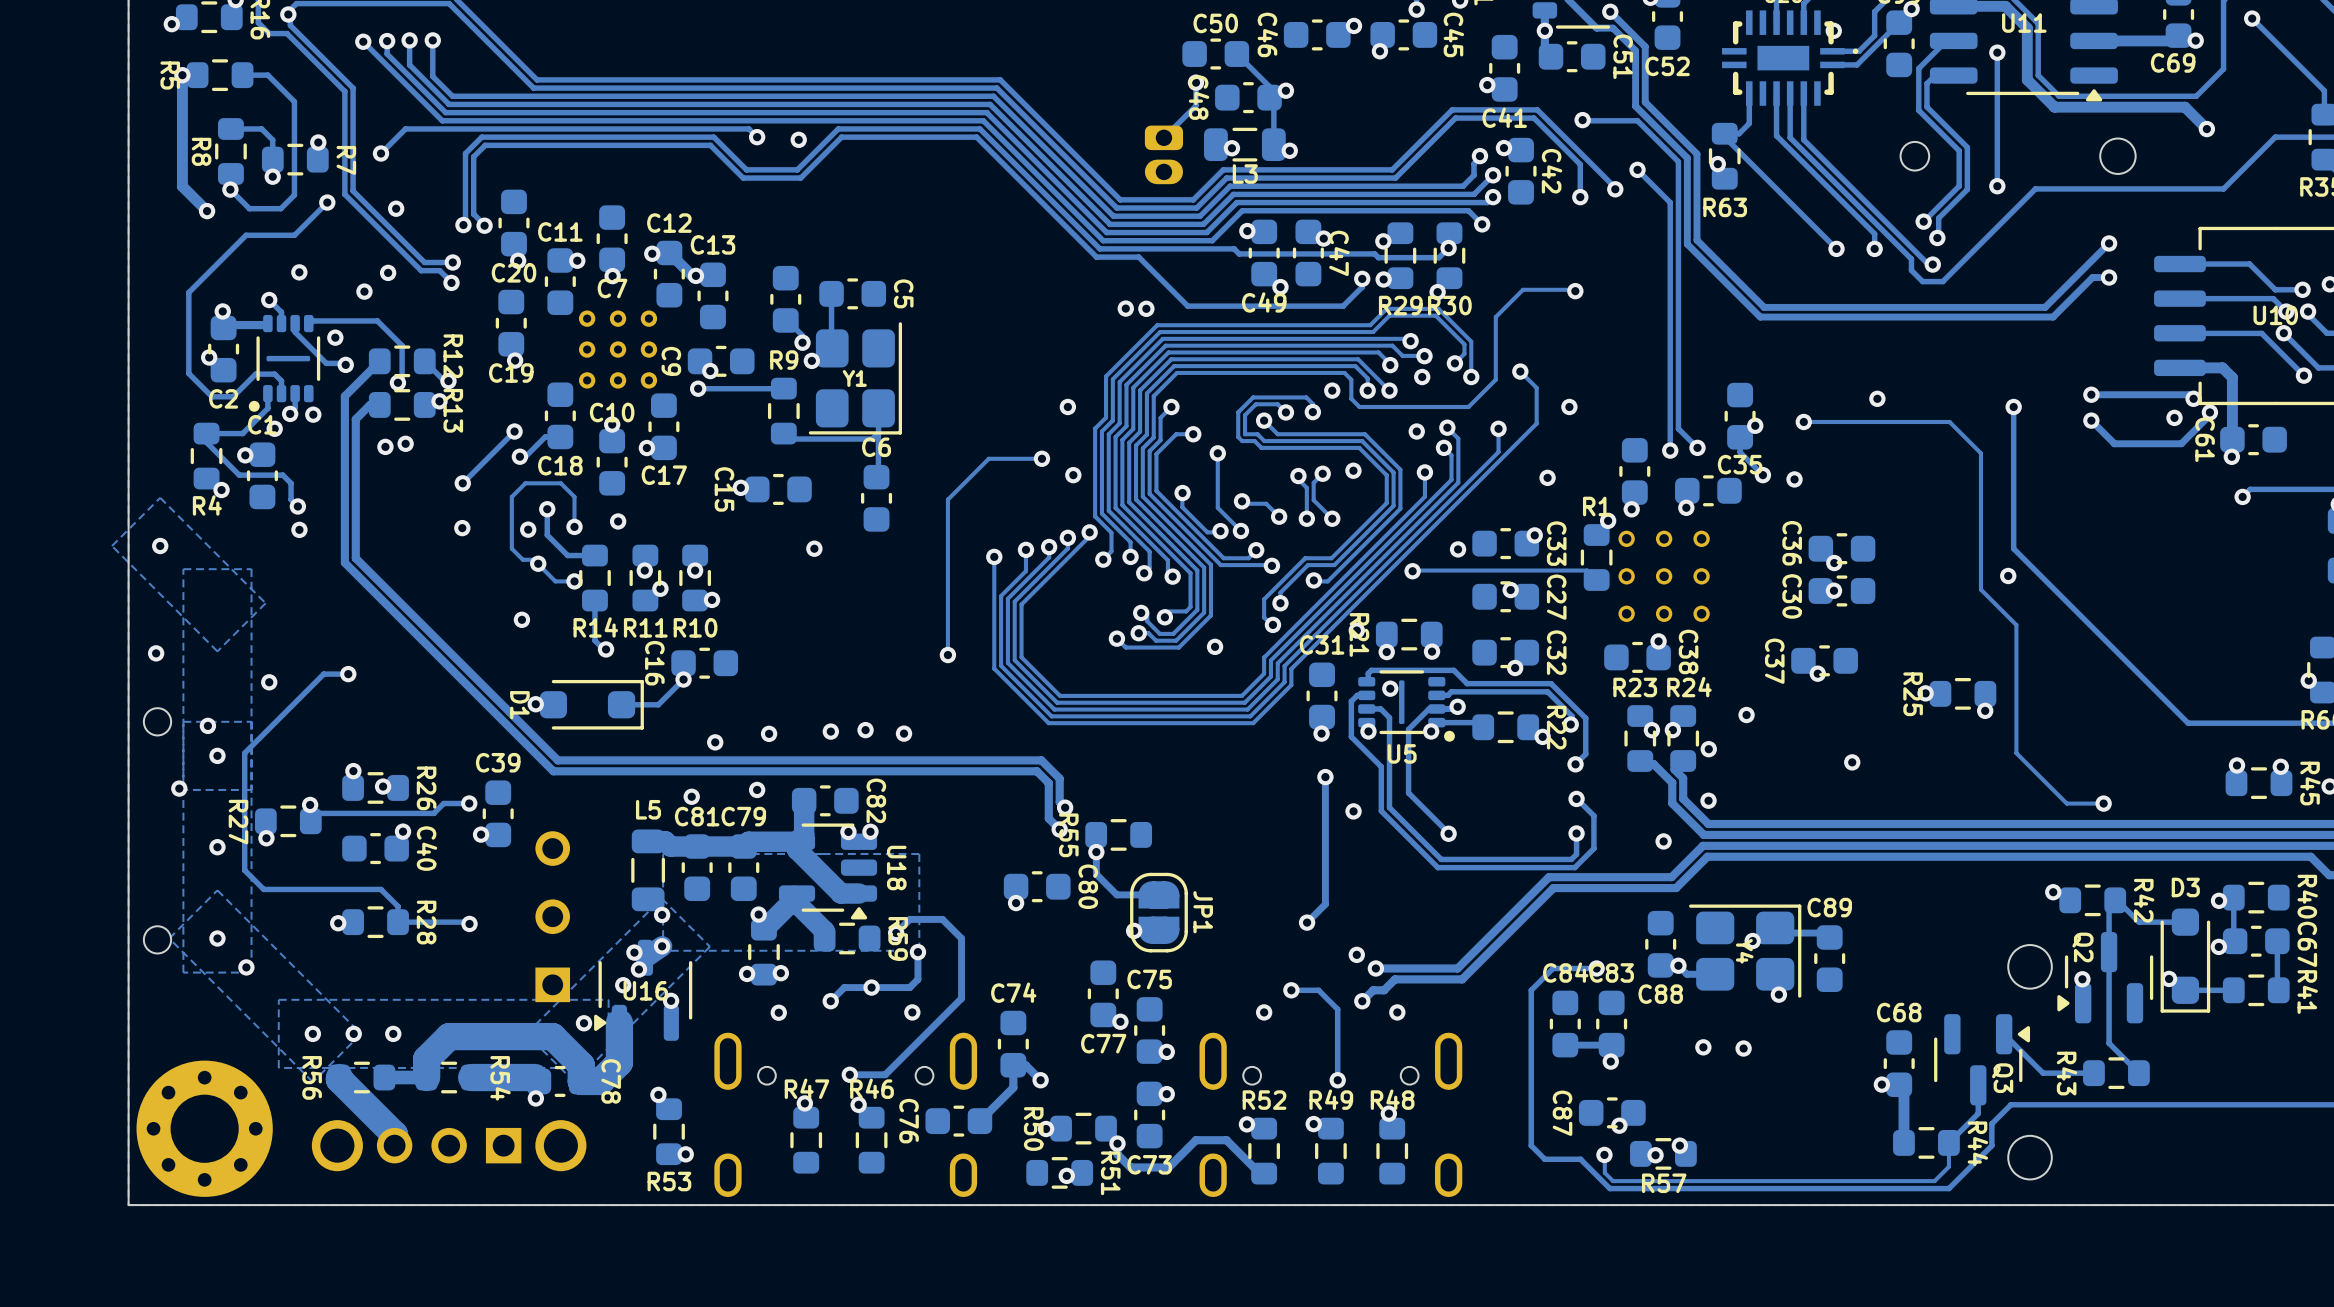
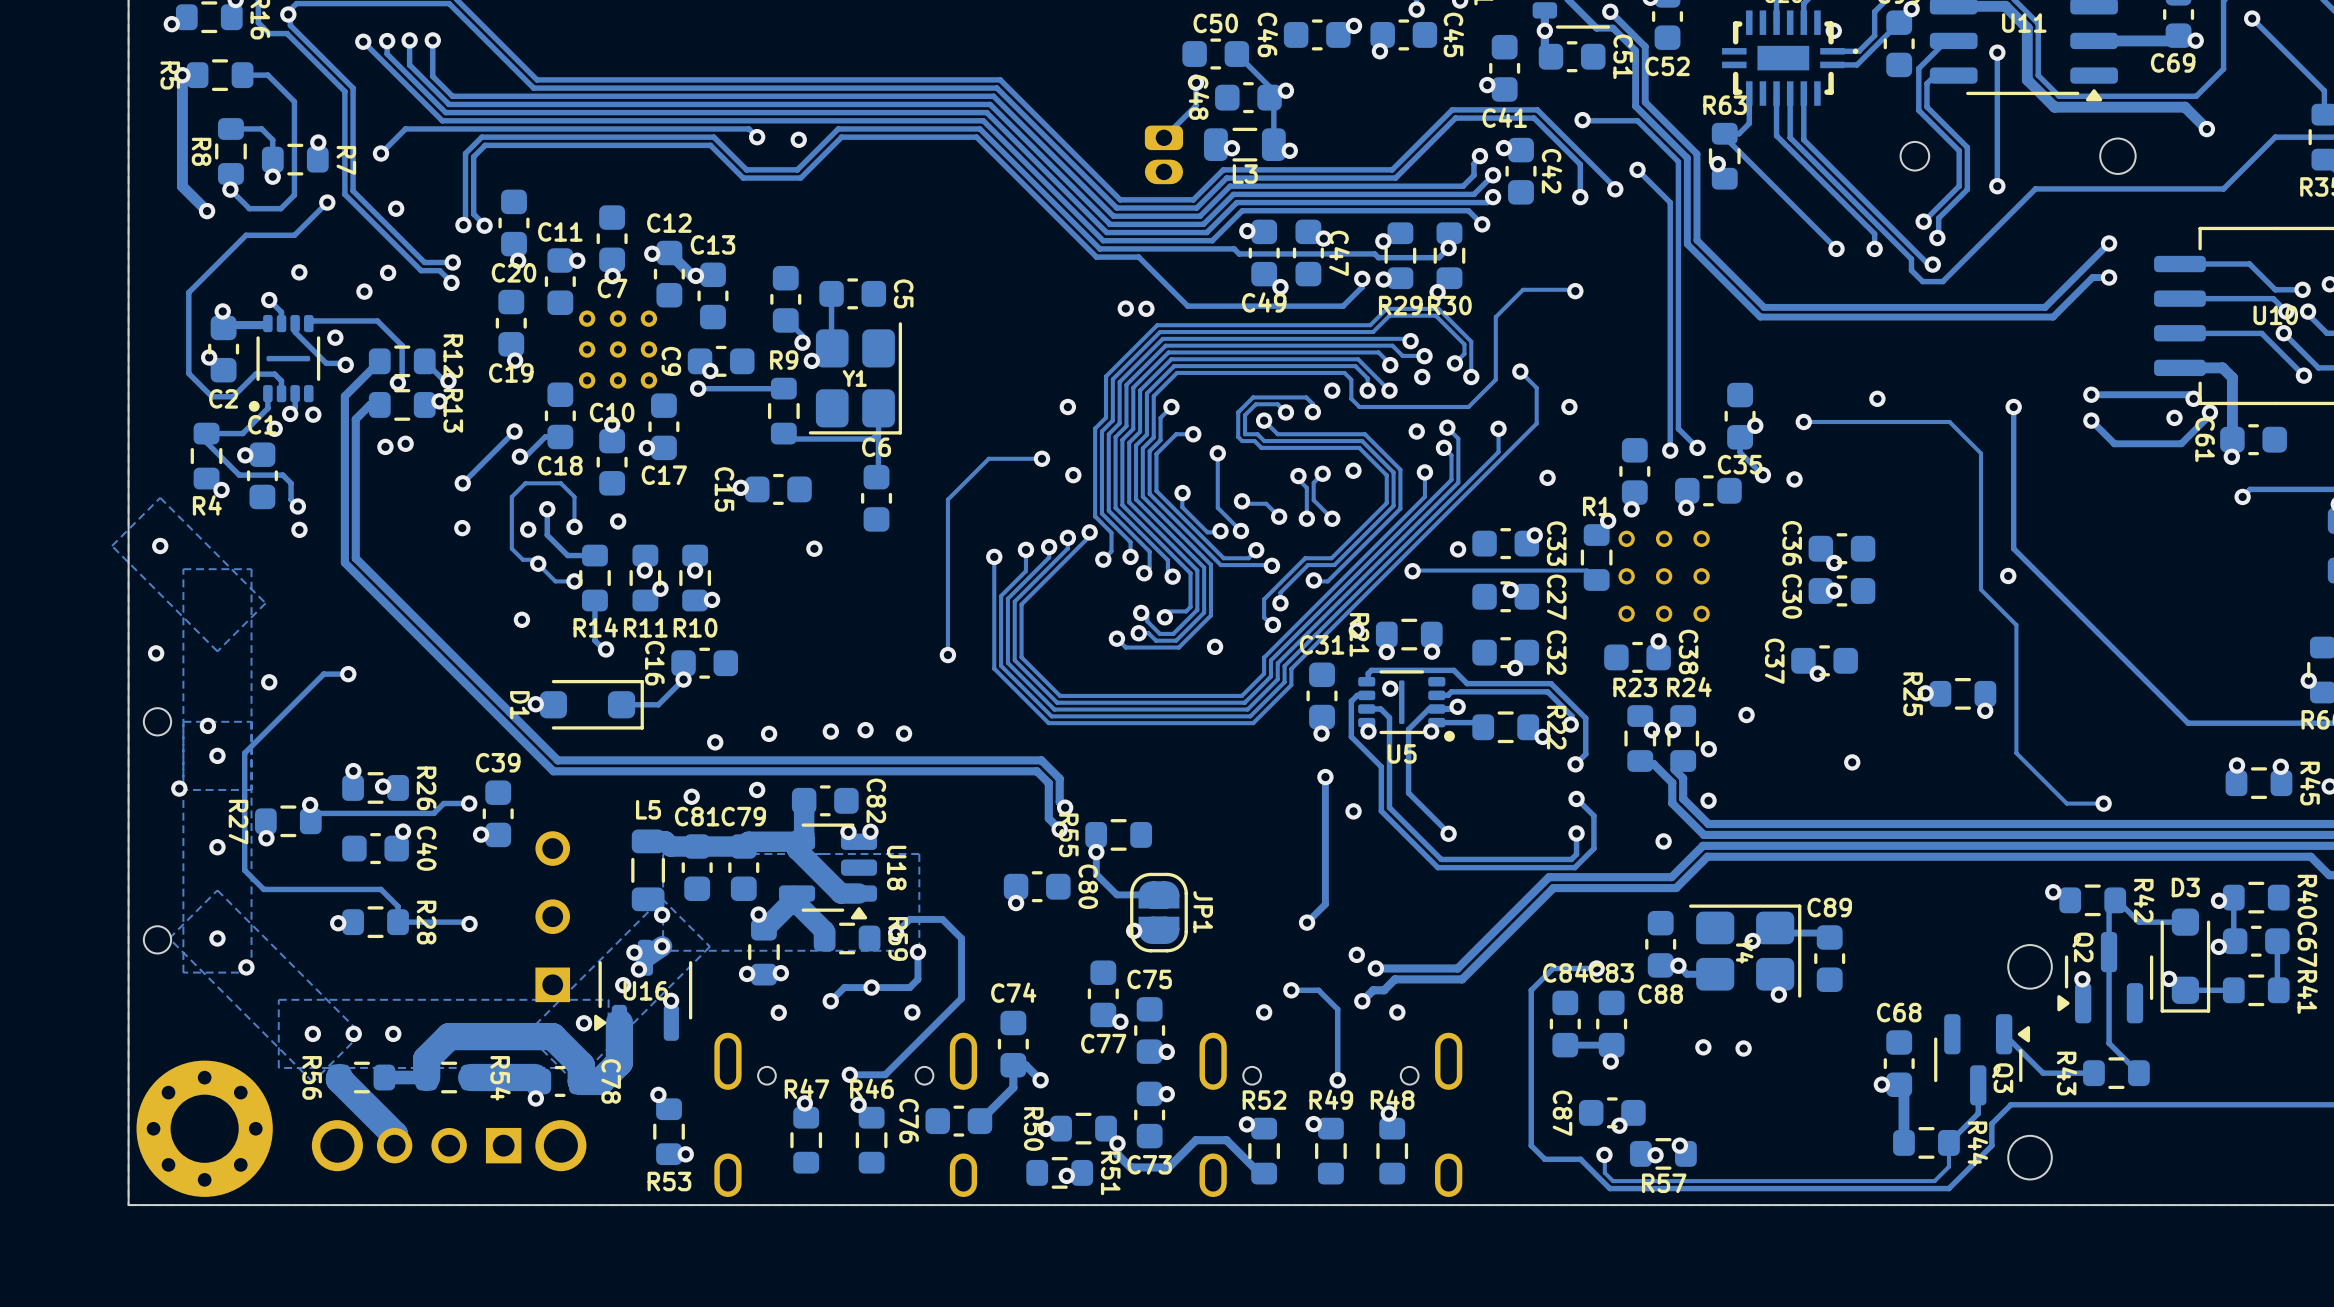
R63 name position: R63 (1725, 207) -> R63 (1725, 105)

